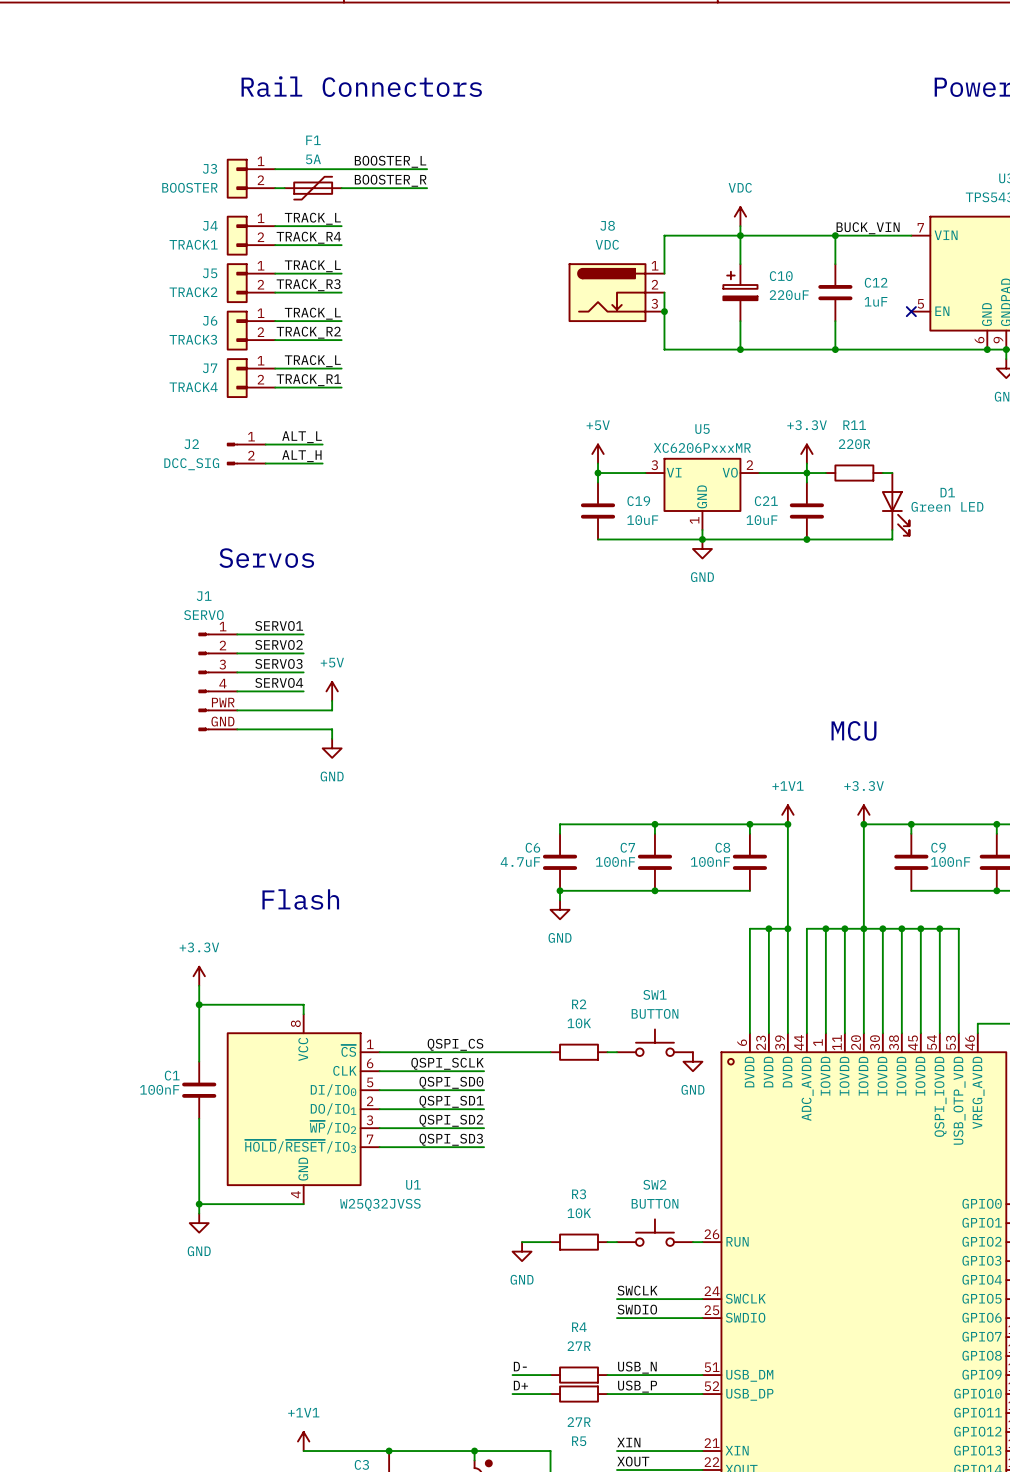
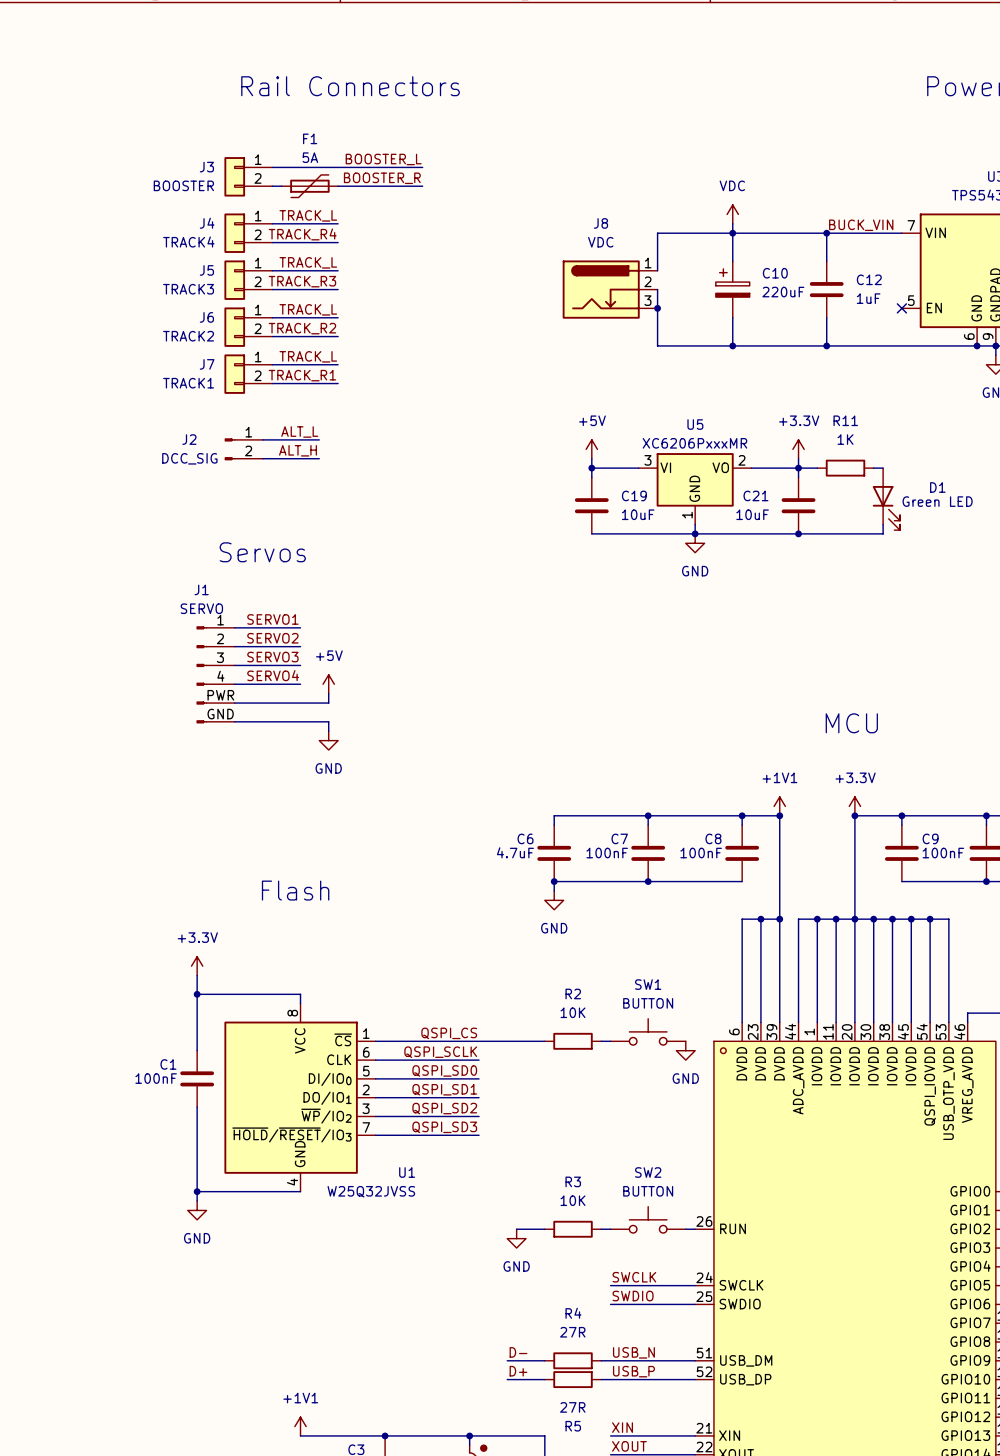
J4 value: TRACK1 (193, 244) -> TRACK4 (188, 242)
J5 value: TRACK2 (193, 292) -> TRACK3 (188, 289)
J6 value: TRACK3 (193, 339) -> TRACK2 (188, 336)
J7 value: TRACK4 (193, 387) -> TRACK1 (188, 383)
R11 value: 220R (854, 444) -> 1K (845, 439)

